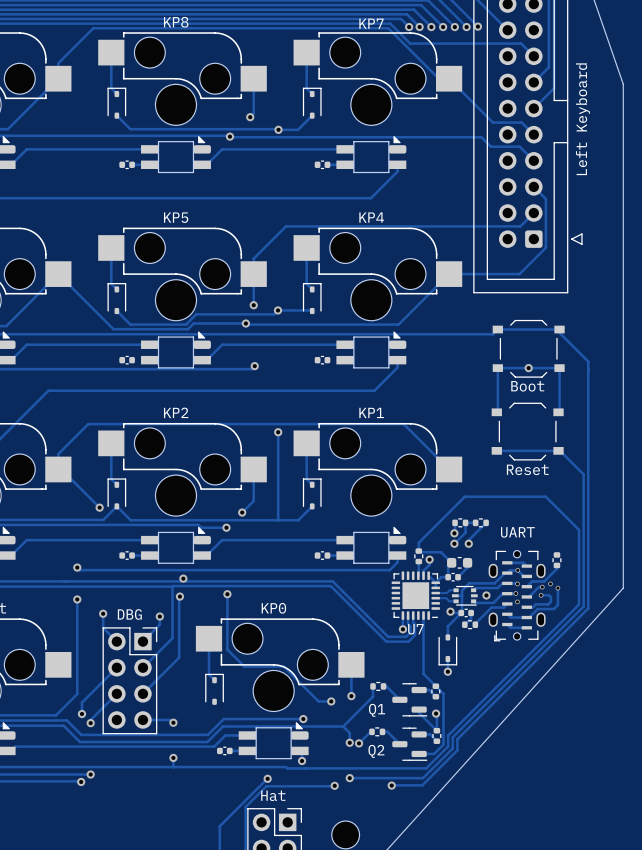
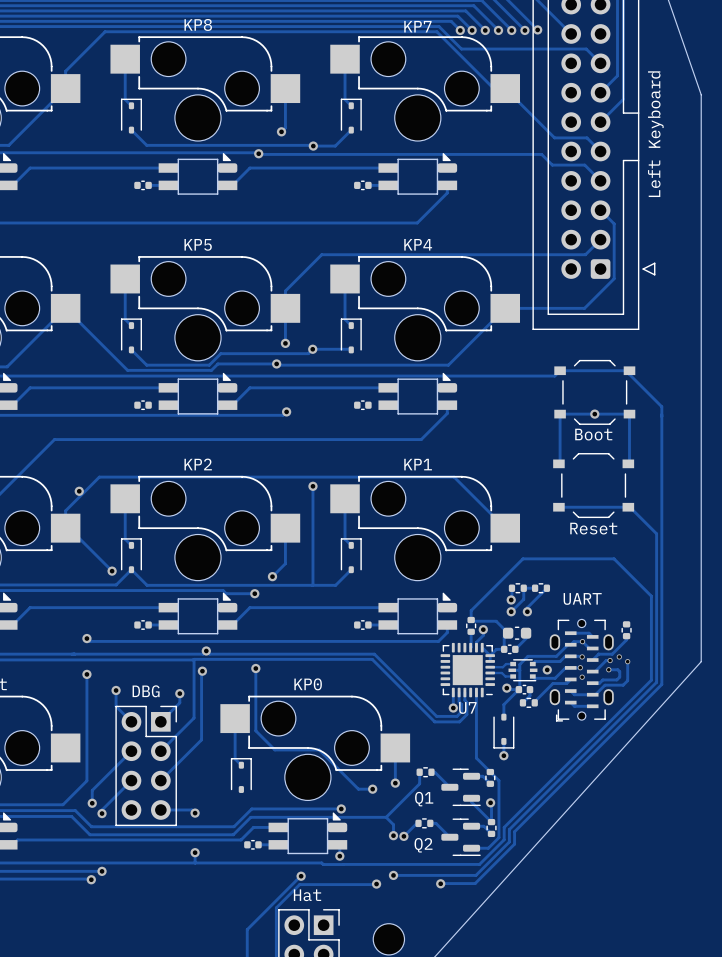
via: none -> (79, 491)

